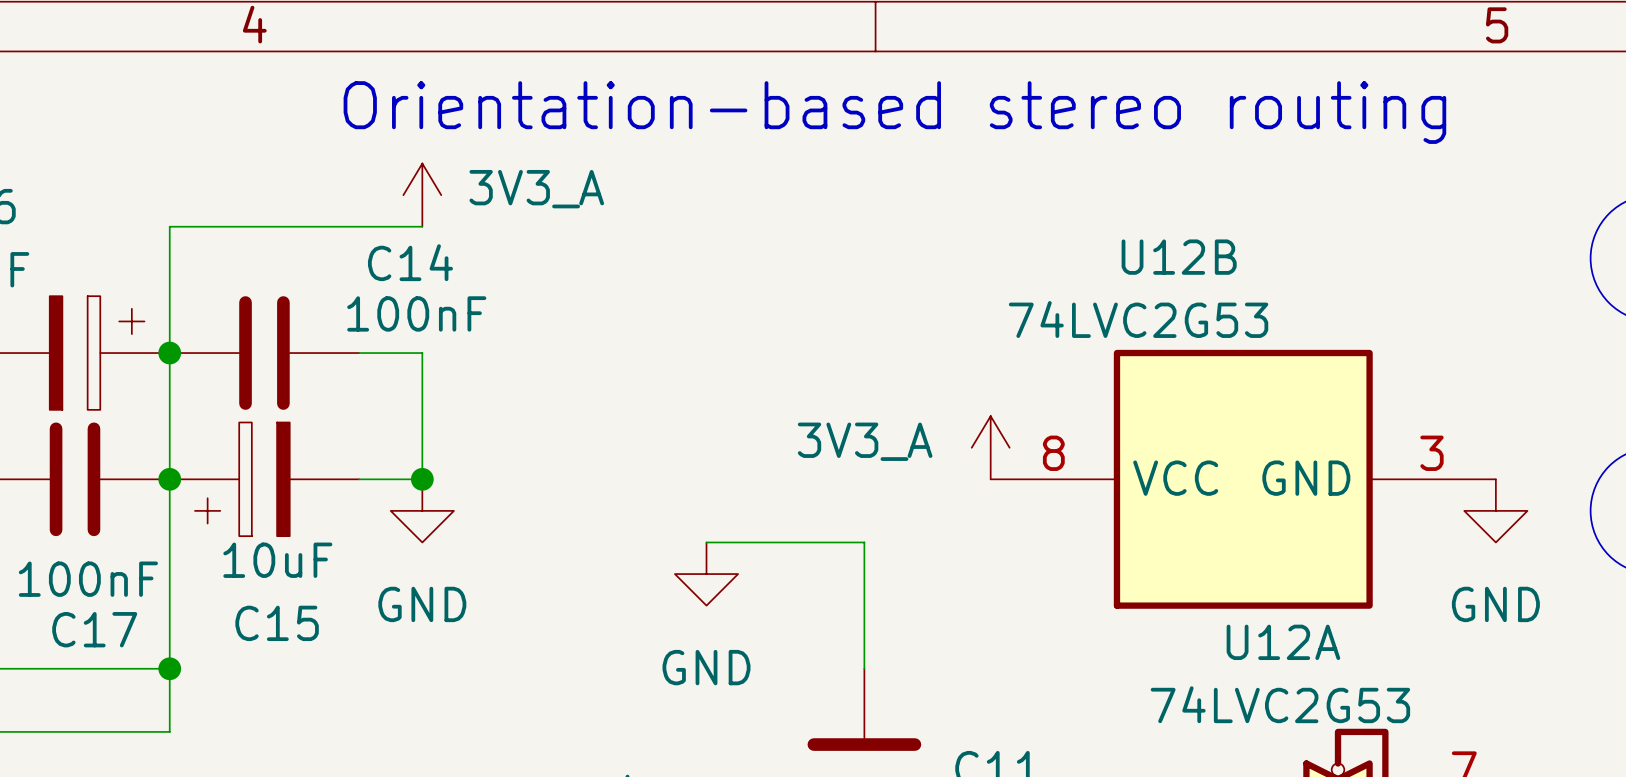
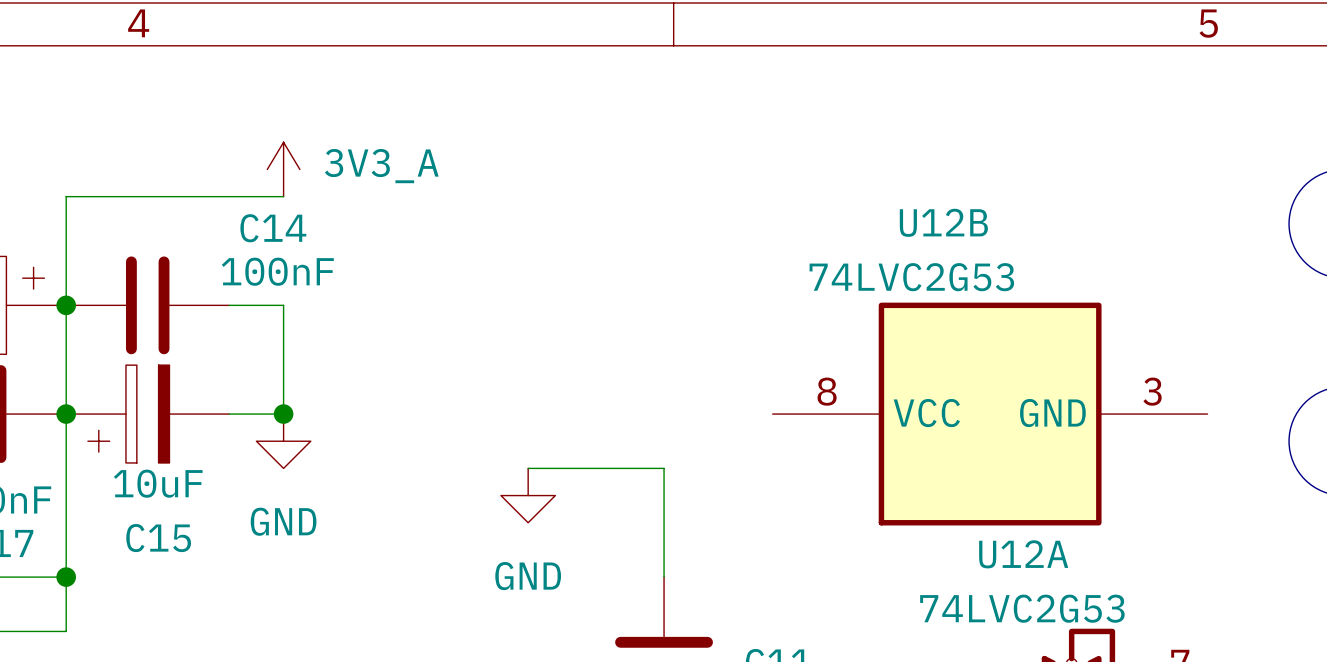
text: Orientation-based stereo routing (894, 112) -> none
power symbol: 3V3_A (990, 447) -> none
power symbol: GND (1495, 510) -> none

